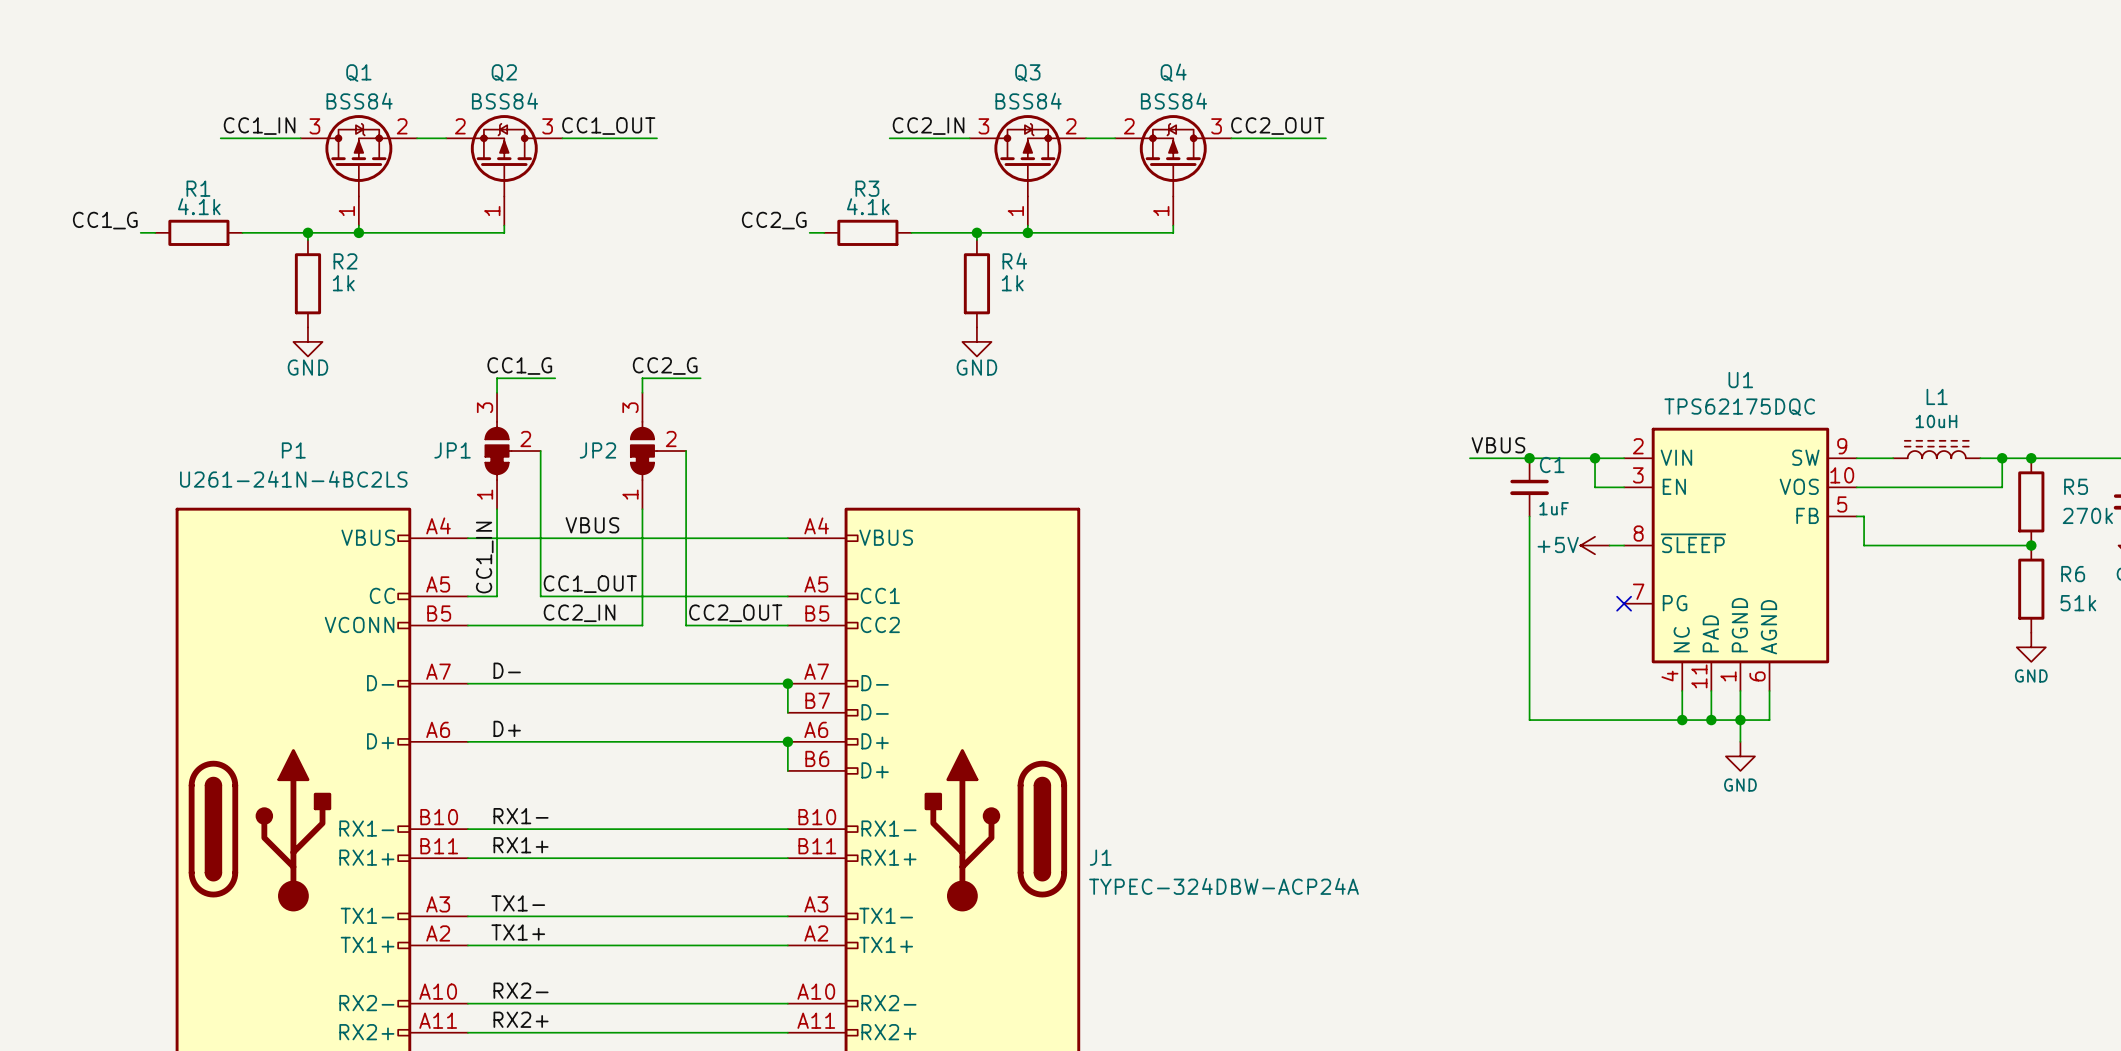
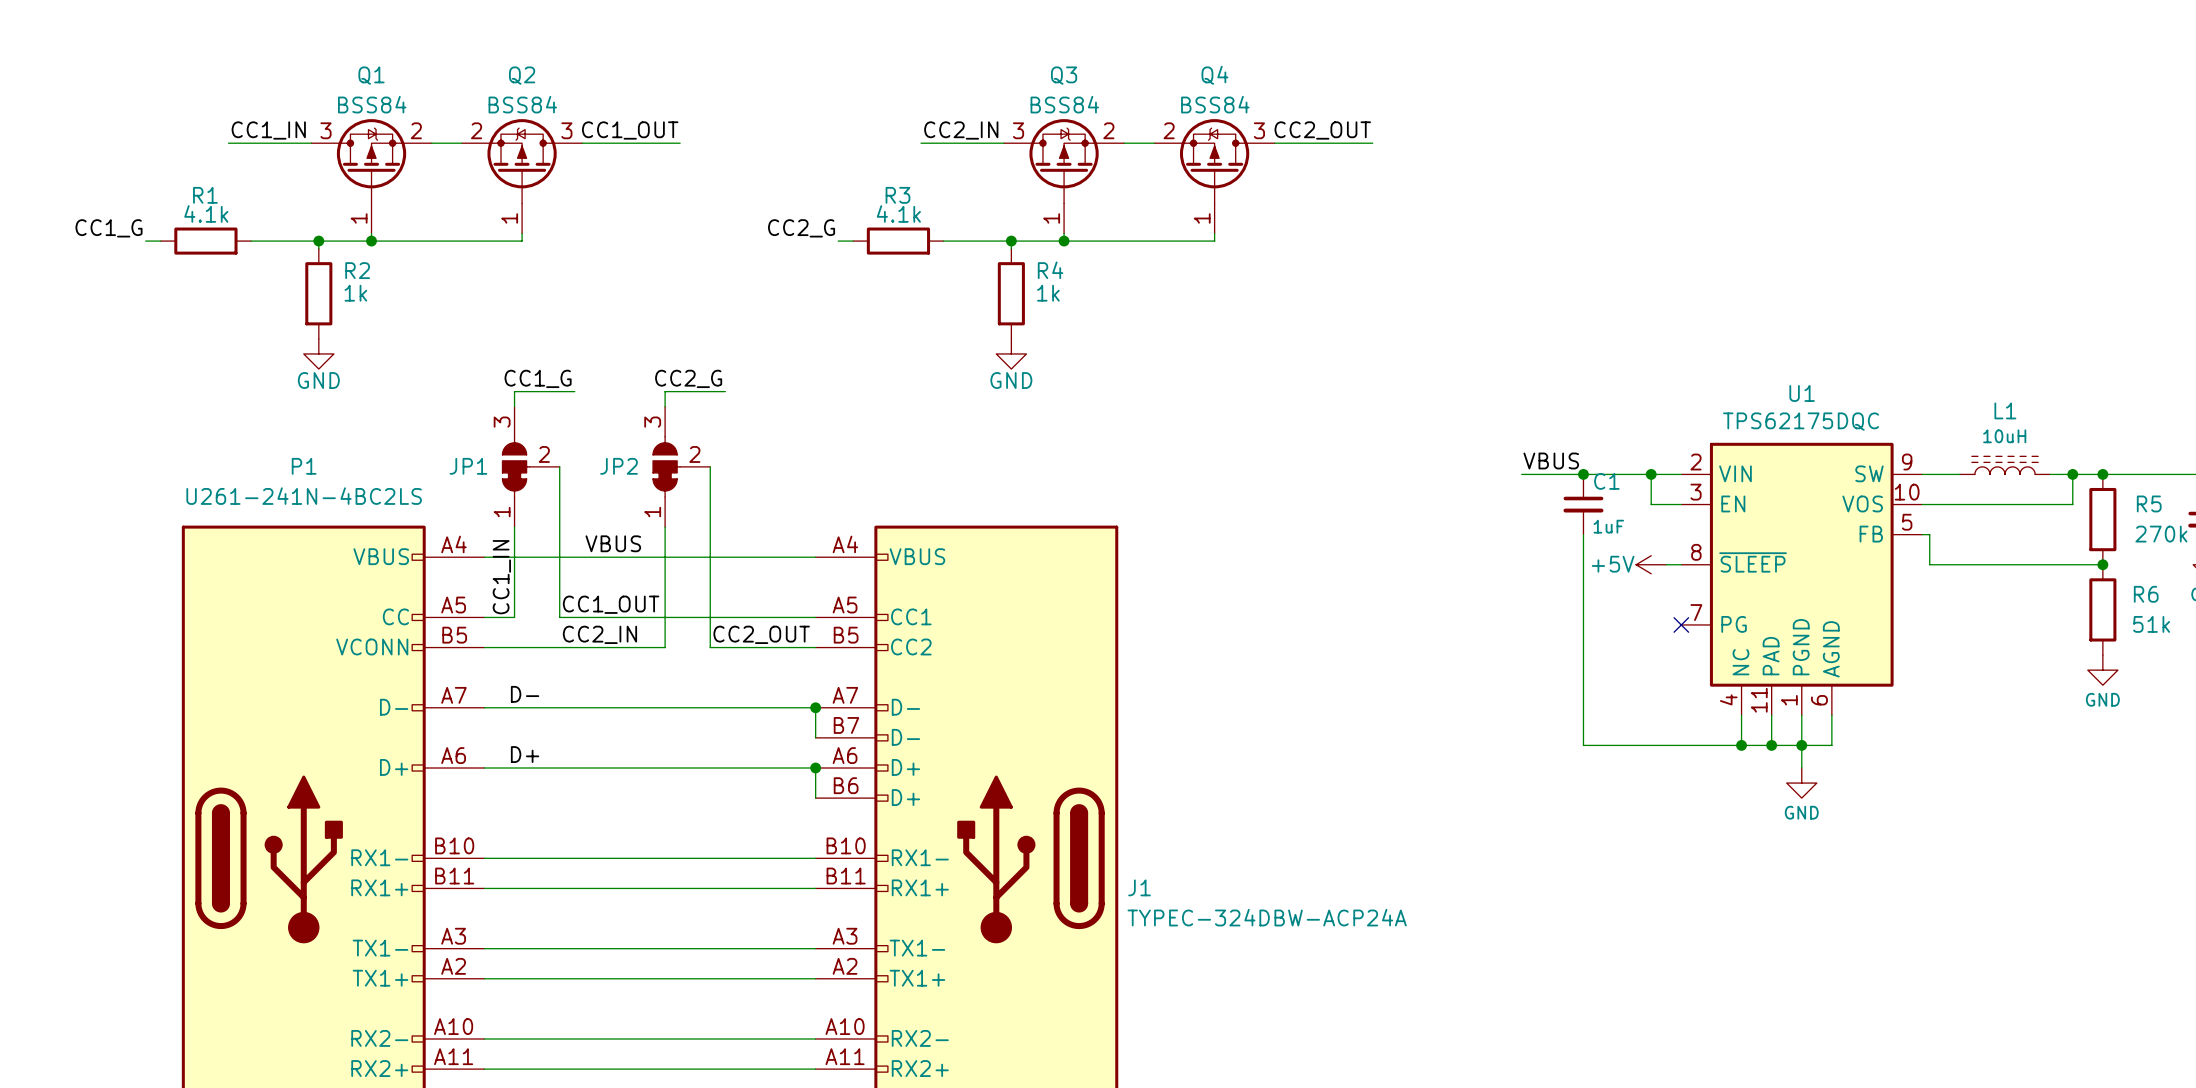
label: RX1- (521, 816) -> none
label: RX1+ (521, 845) -> none
label: TX1- (518, 903) -> none
label: TX1+ (518, 932) -> none
label: RX2- (521, 990) -> none
label: RX2+ (521, 1019) -> none

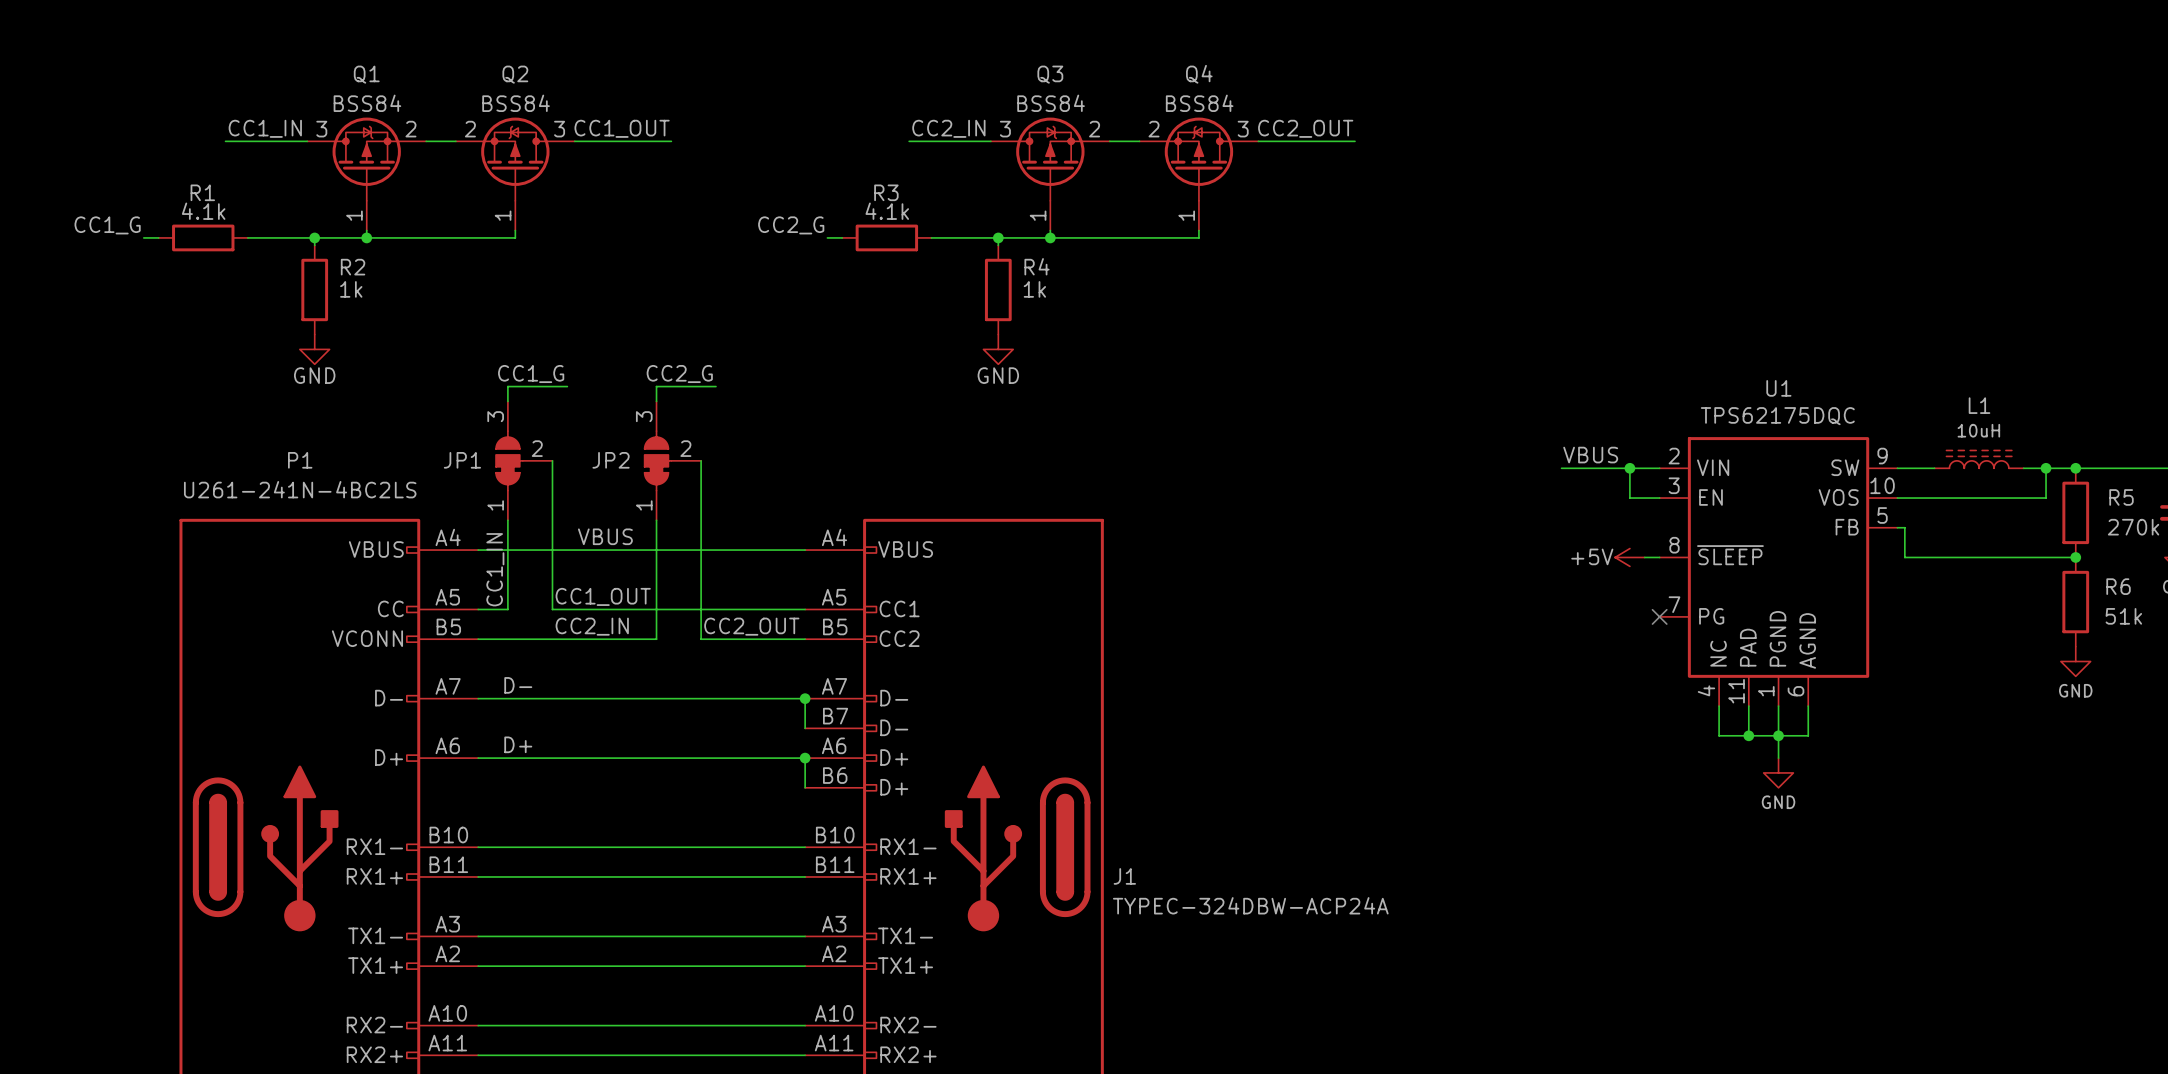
label position: VBUS (1551, 460) -> VBUS (1590, 455)
wire: (1521, 474) (1581, 474) -> none
junction: (1583, 474) -> none
C1: 1uF (1583, 504) -> none
wire: (1583, 534) (1583, 745) (1741, 745) -> none
junction: (1741, 745) -> none

